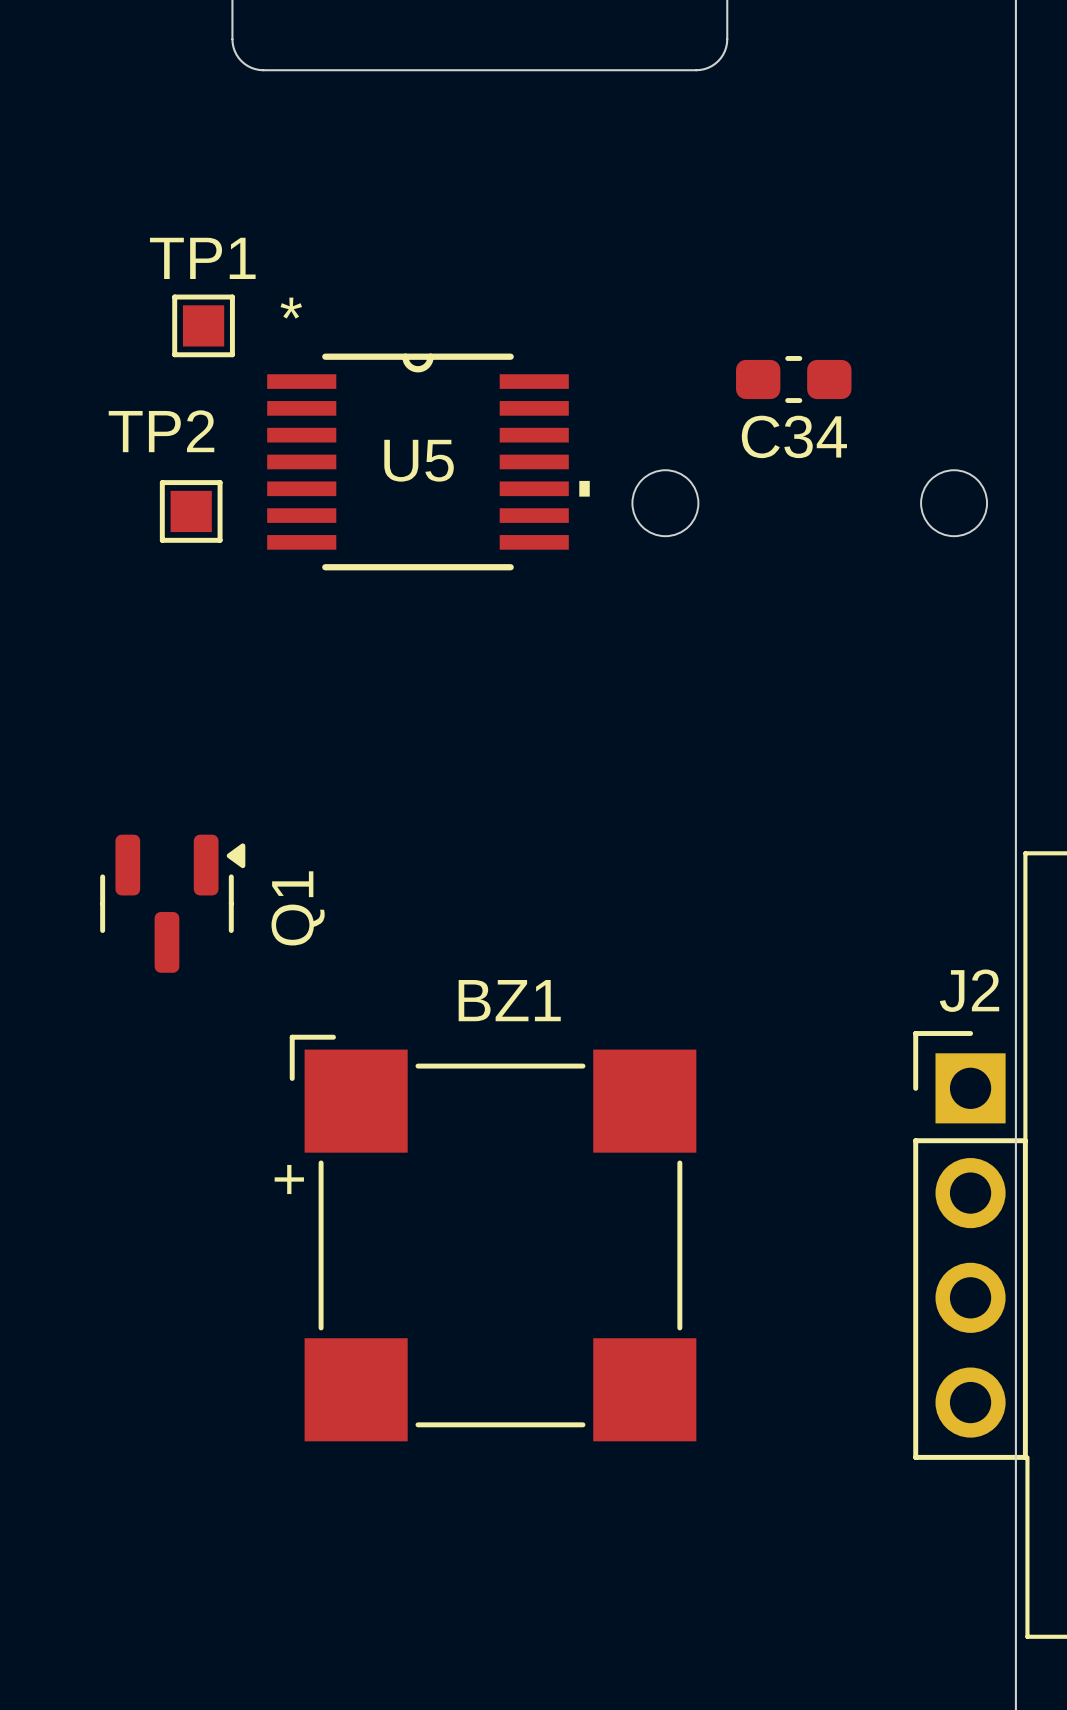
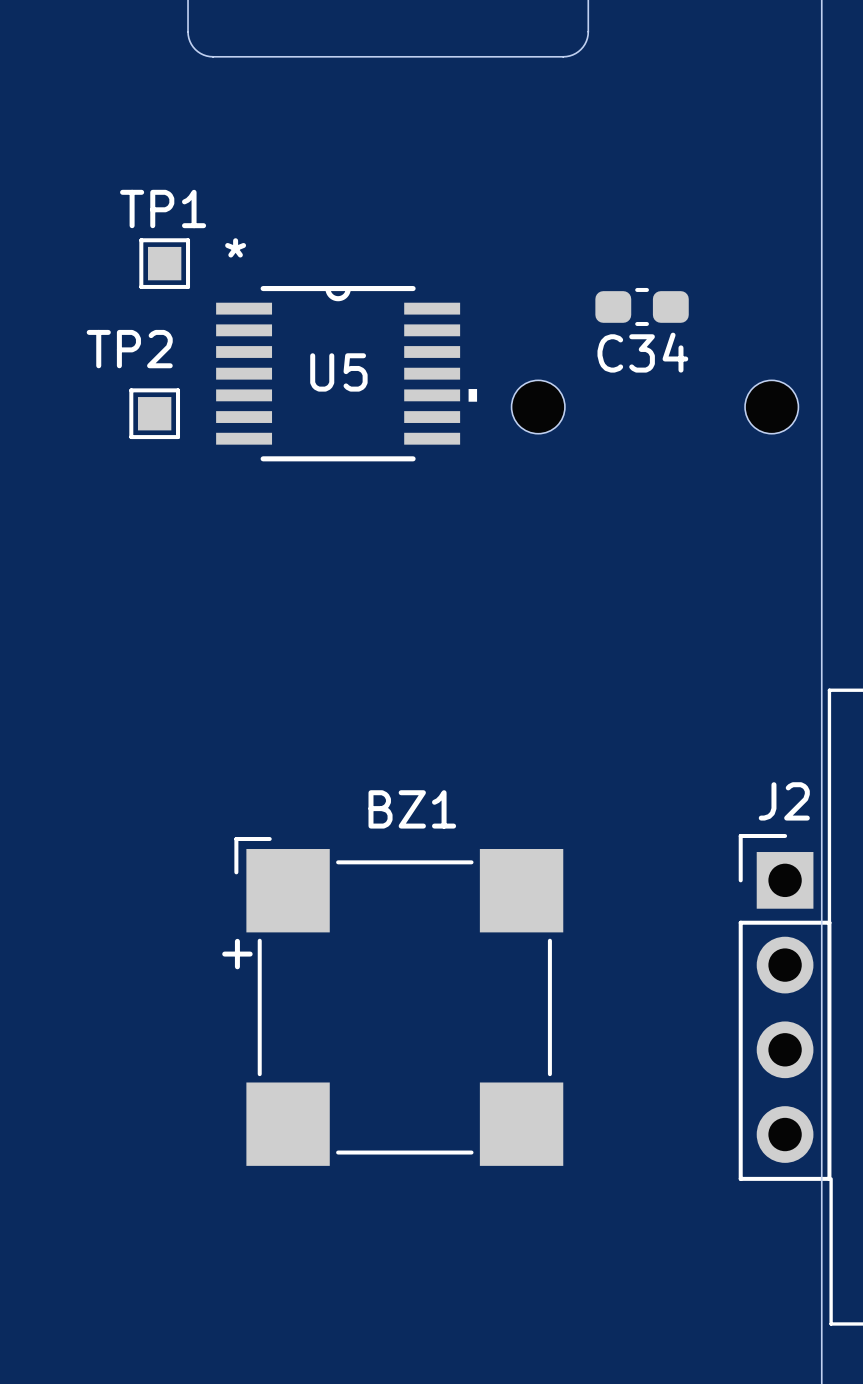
Q1: (172, 903) -> none

